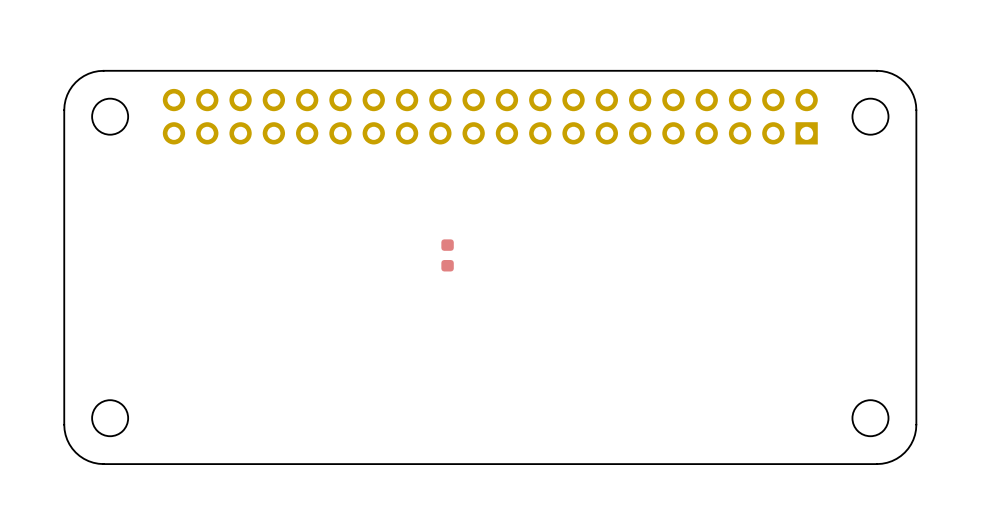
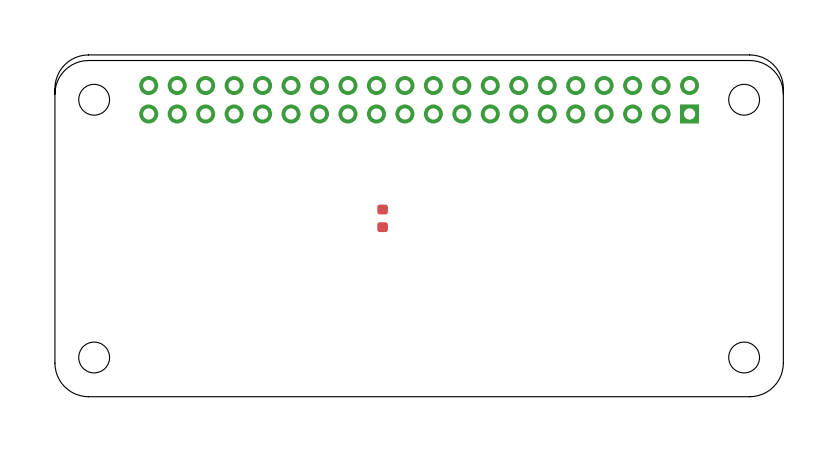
board edge: none -> (783, 94) (782, 79) (776, 68) (766, 59) (749, 54) (88, 54) (71, 59) (61, 68) (56, 79) (54, 94)

